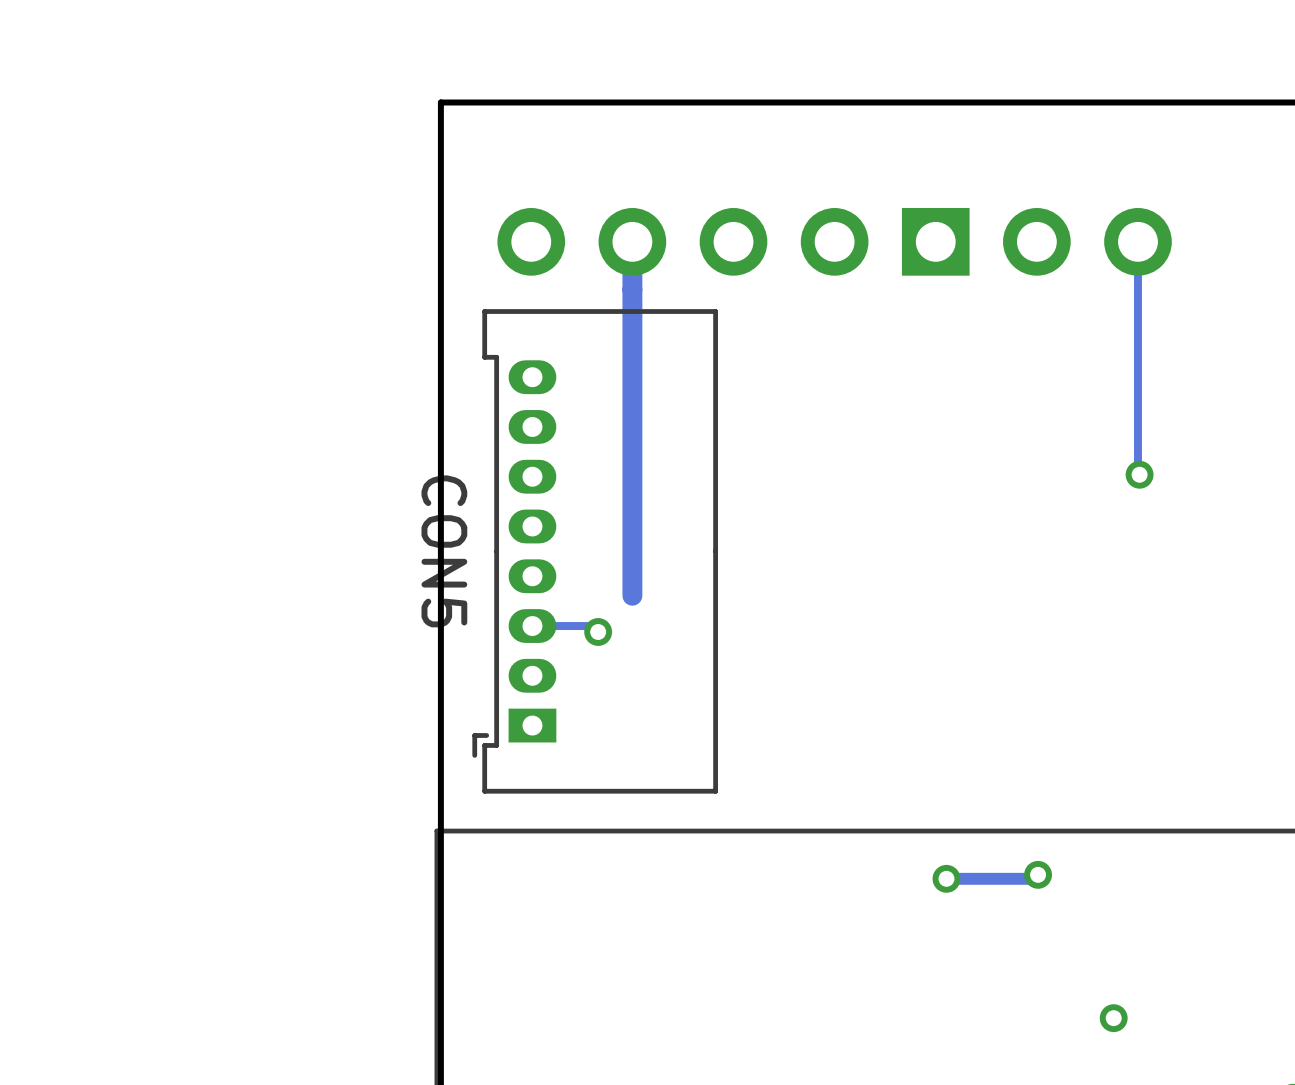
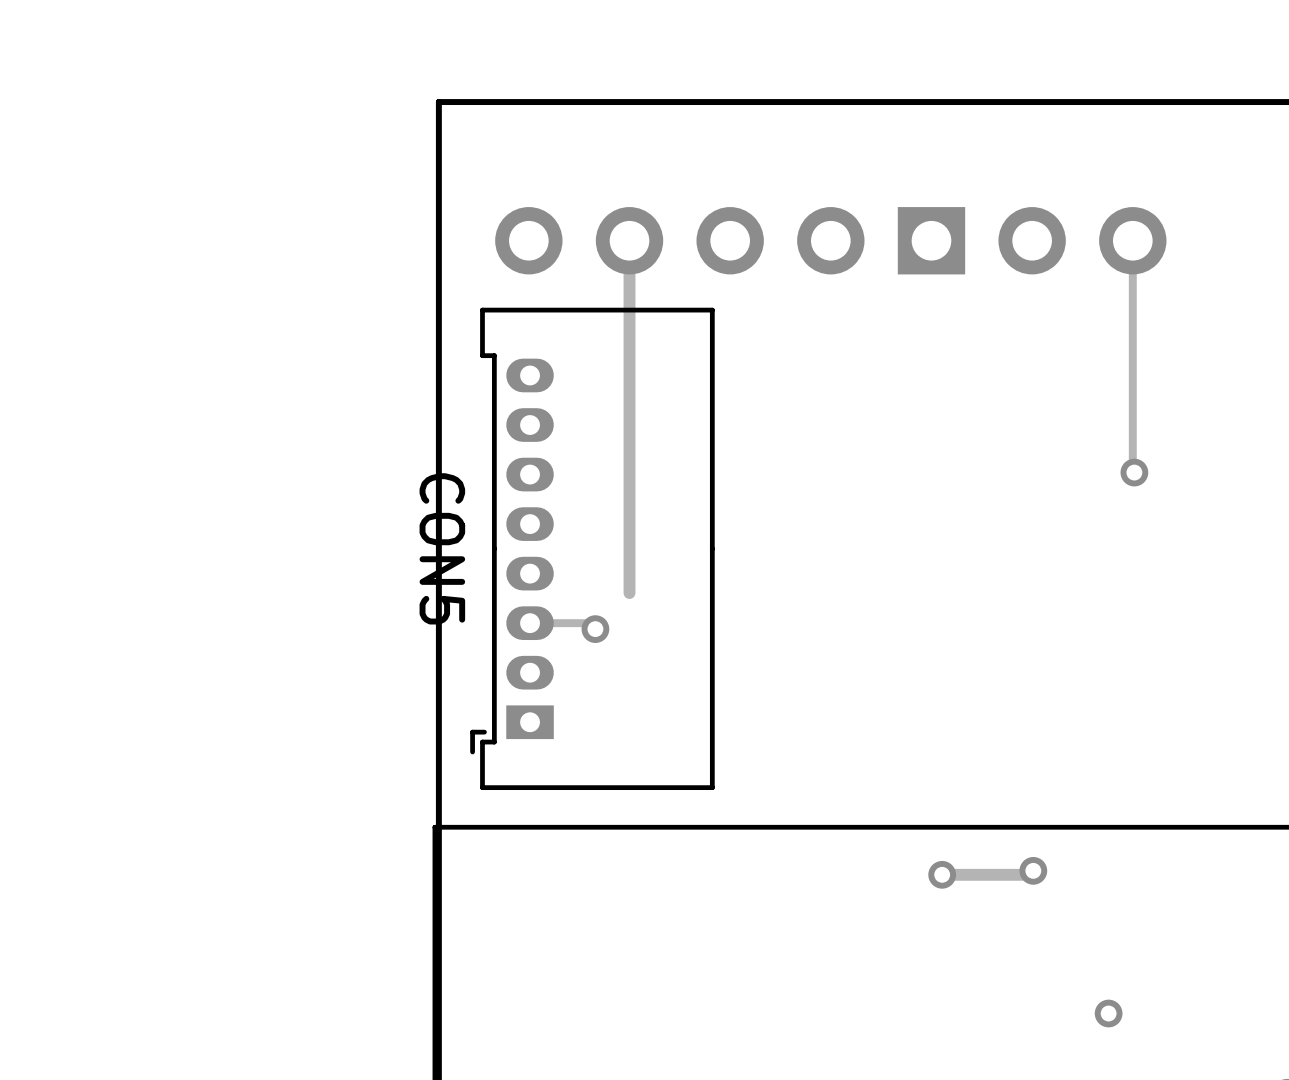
track width: thick (632, 241) (632, 595) -> thin (629, 240) (629, 593)

